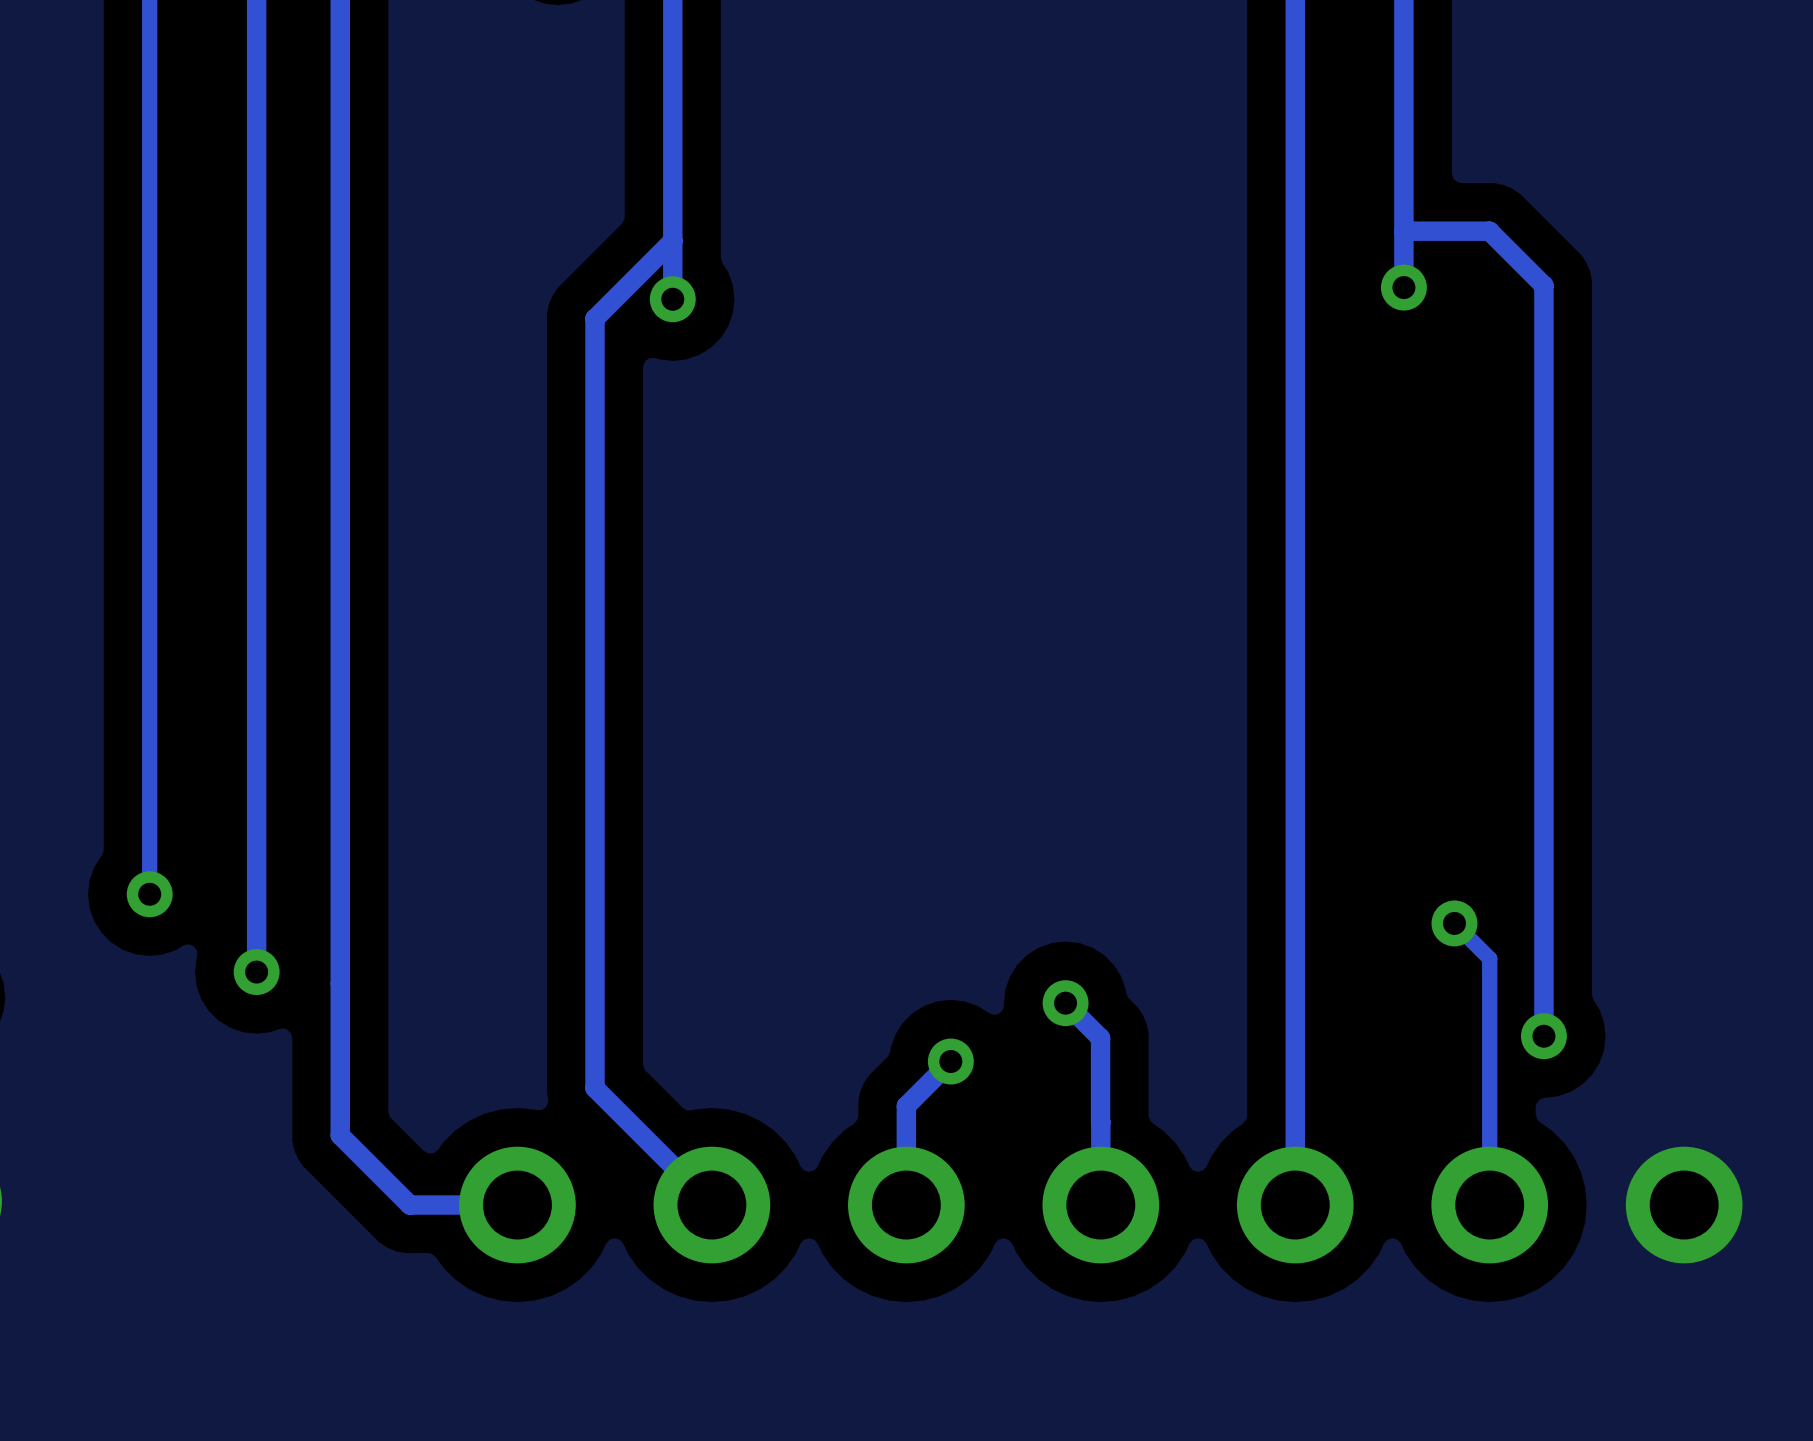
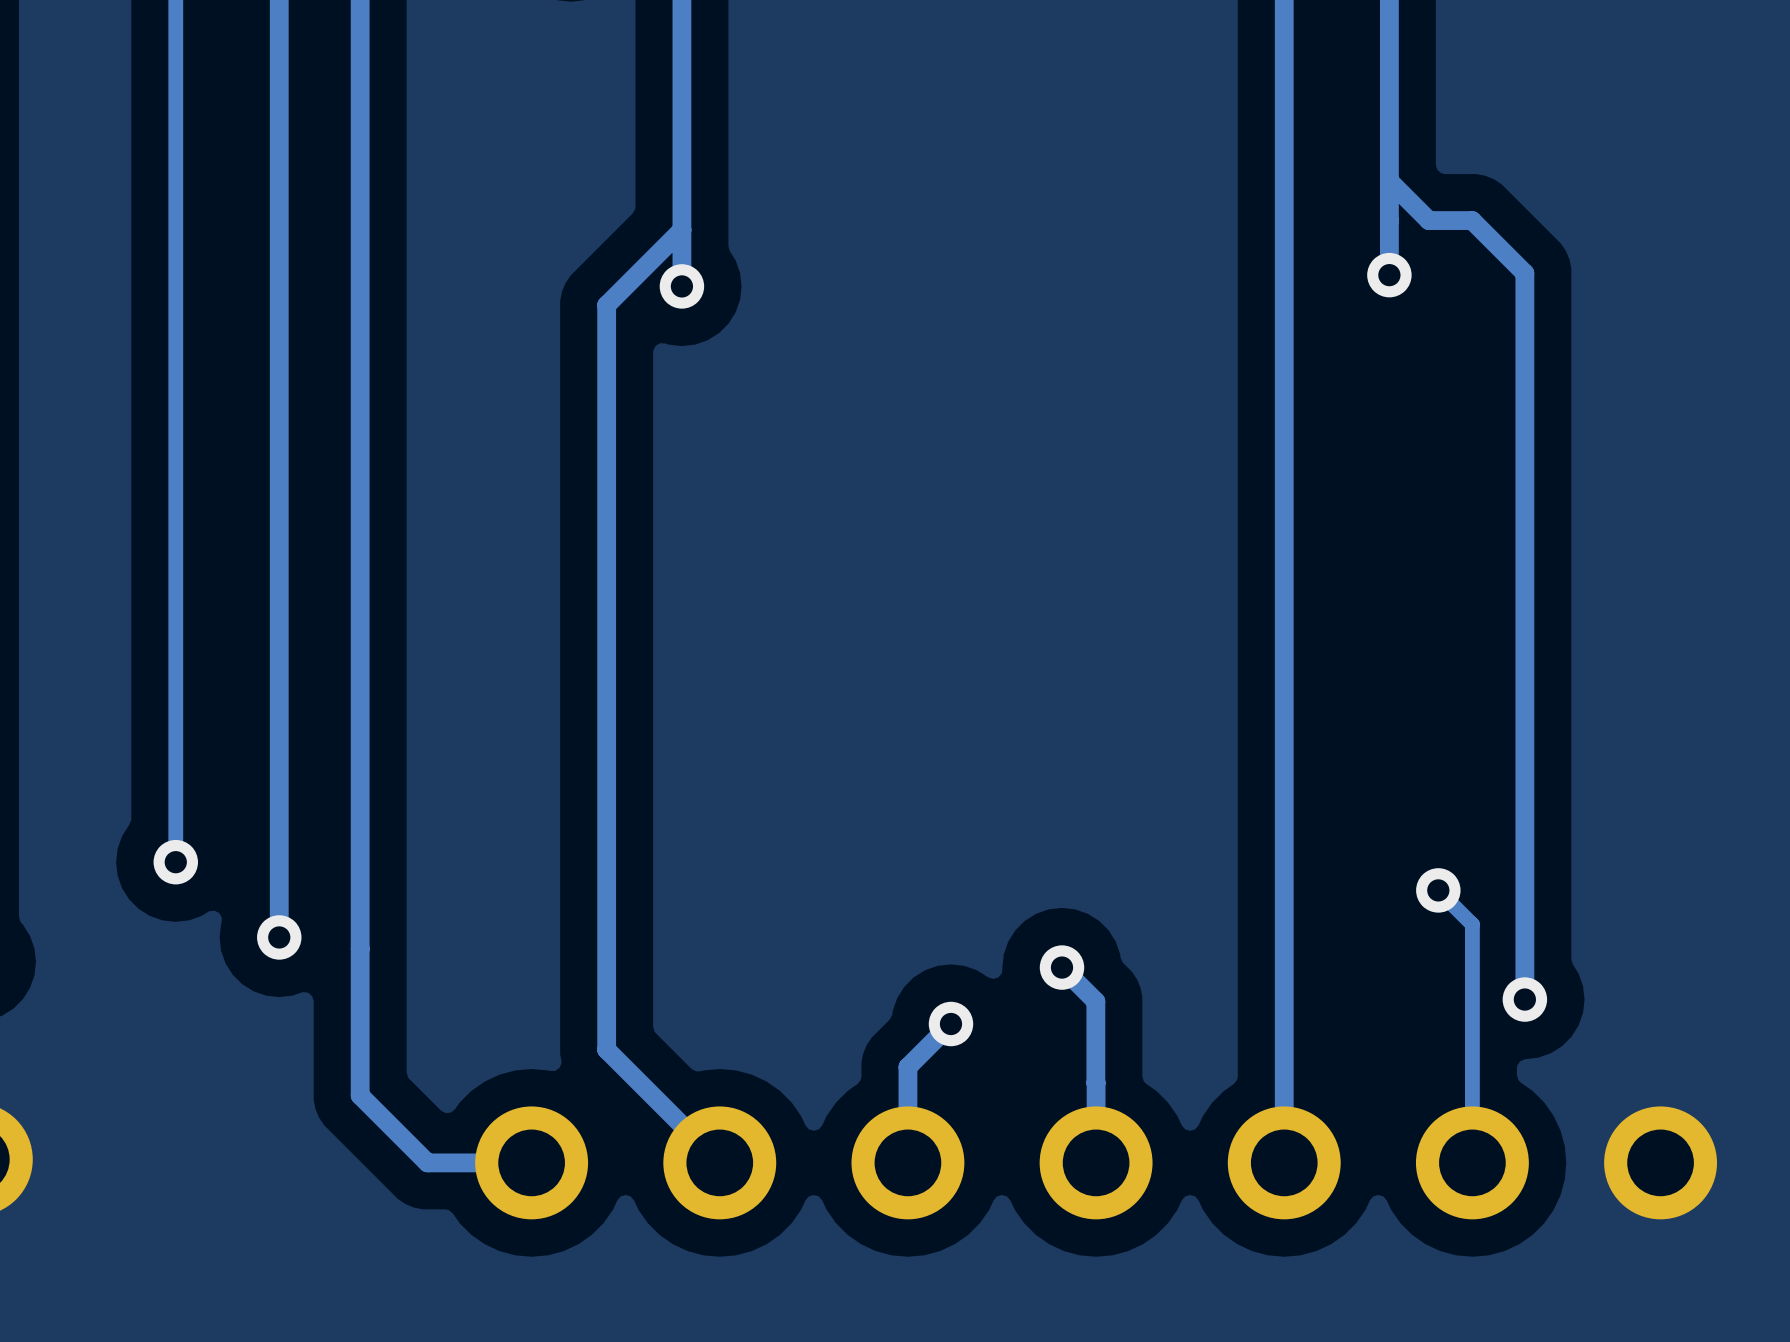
track: (1444, 231) (1403, 231) -> (1428, 220) (1389, 181)

